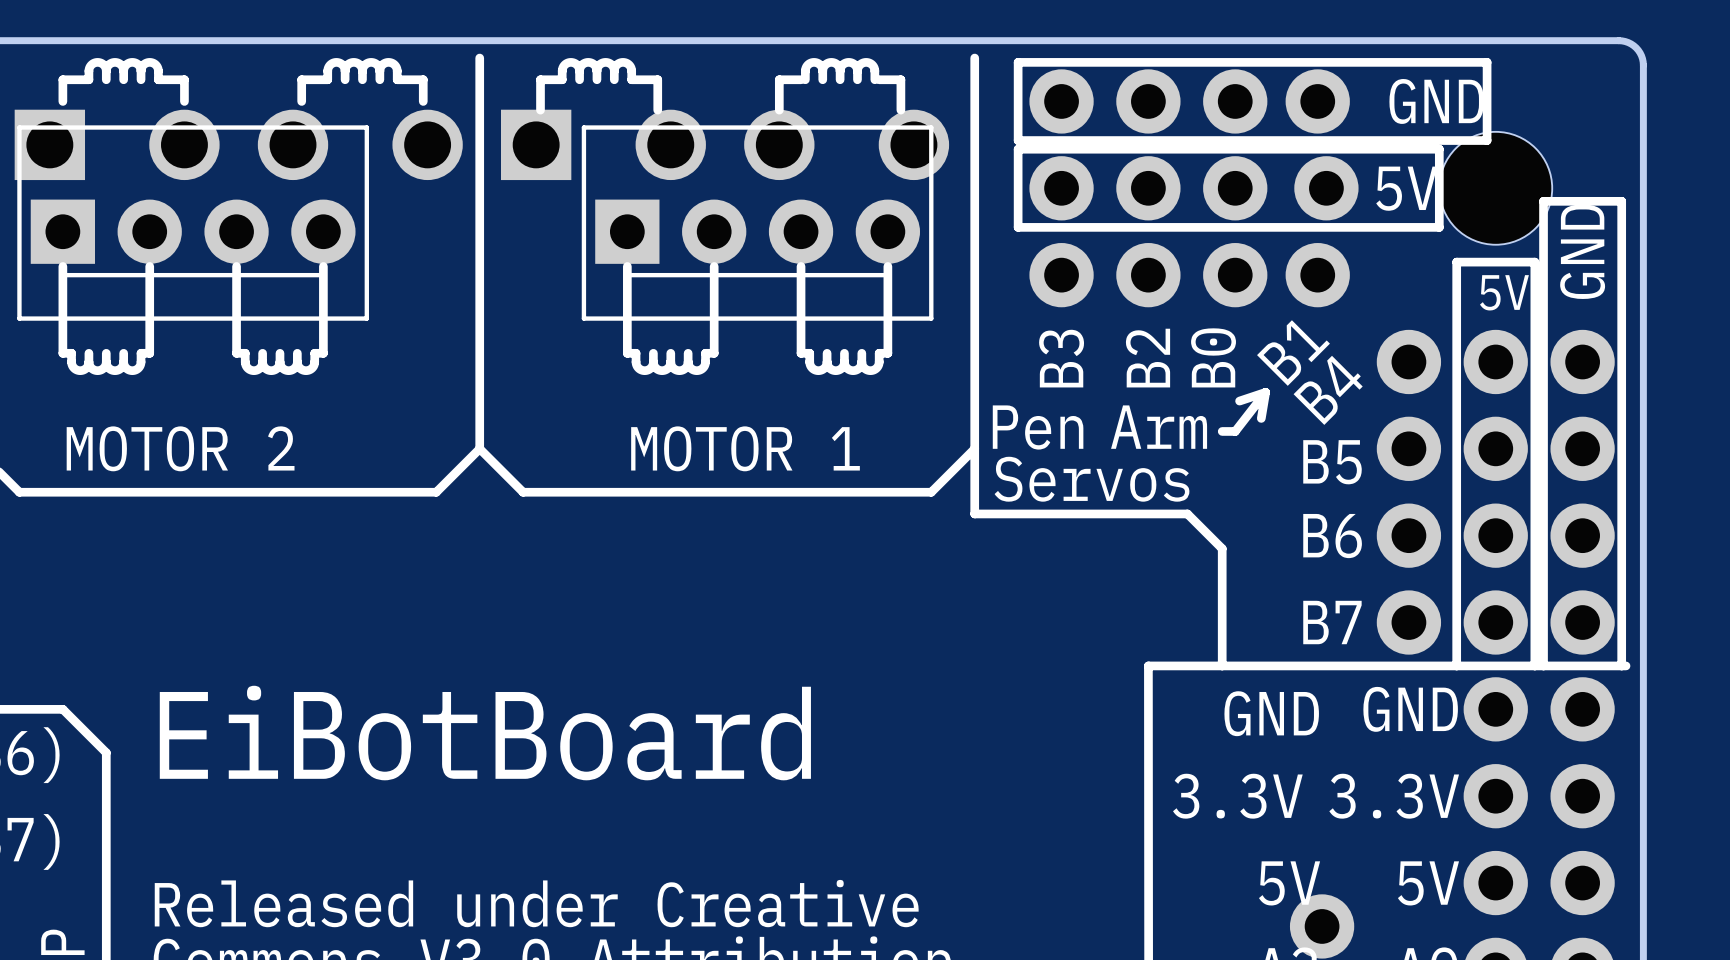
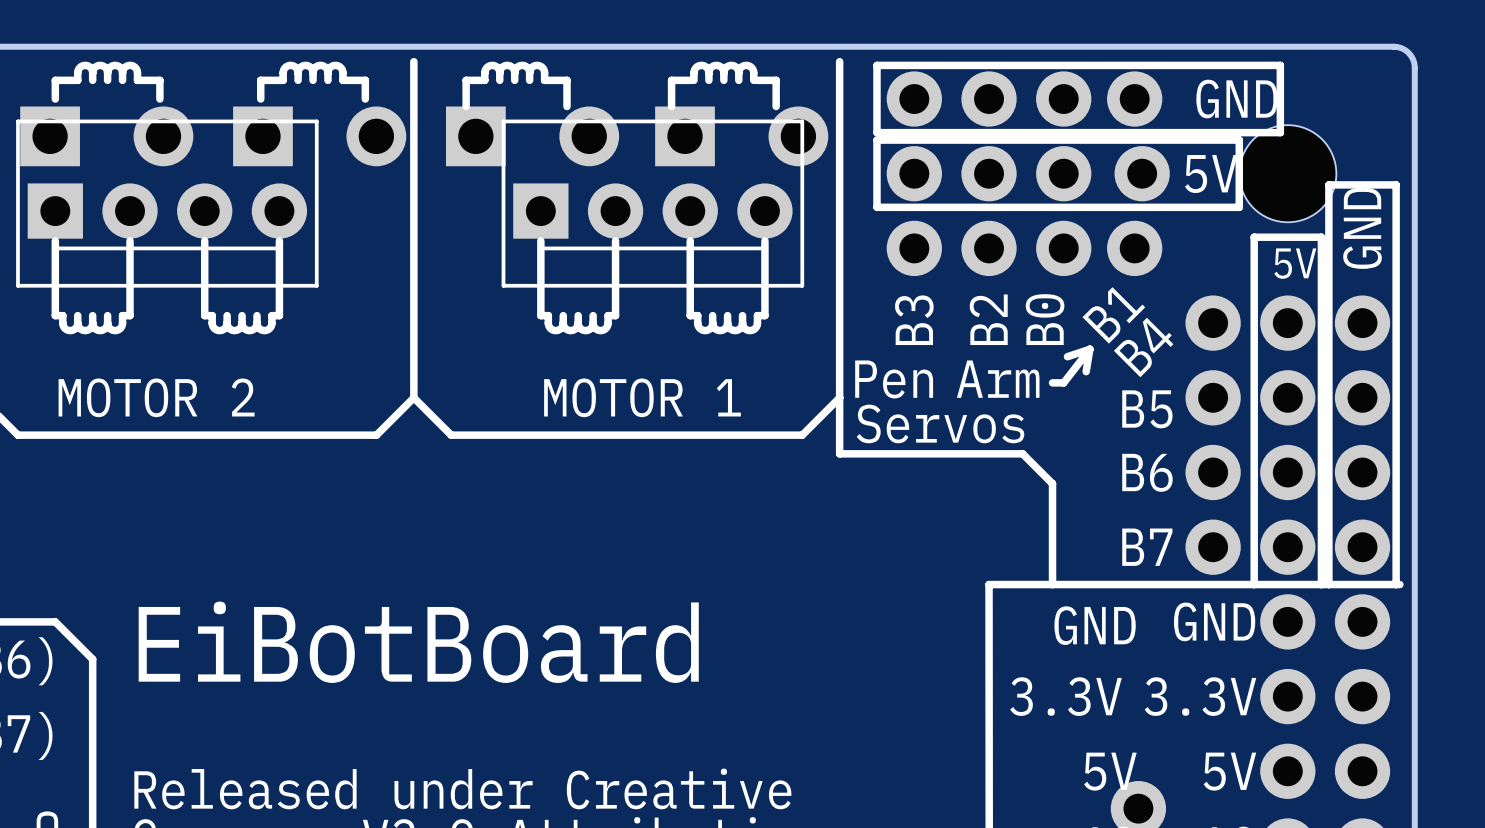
part: none -> (106, 136)
part: (238, 144) -> none
part: none -> (319, 136)
part: none -> (532, 136)
part: (725, 144) -> none
part: none -> (741, 136)

